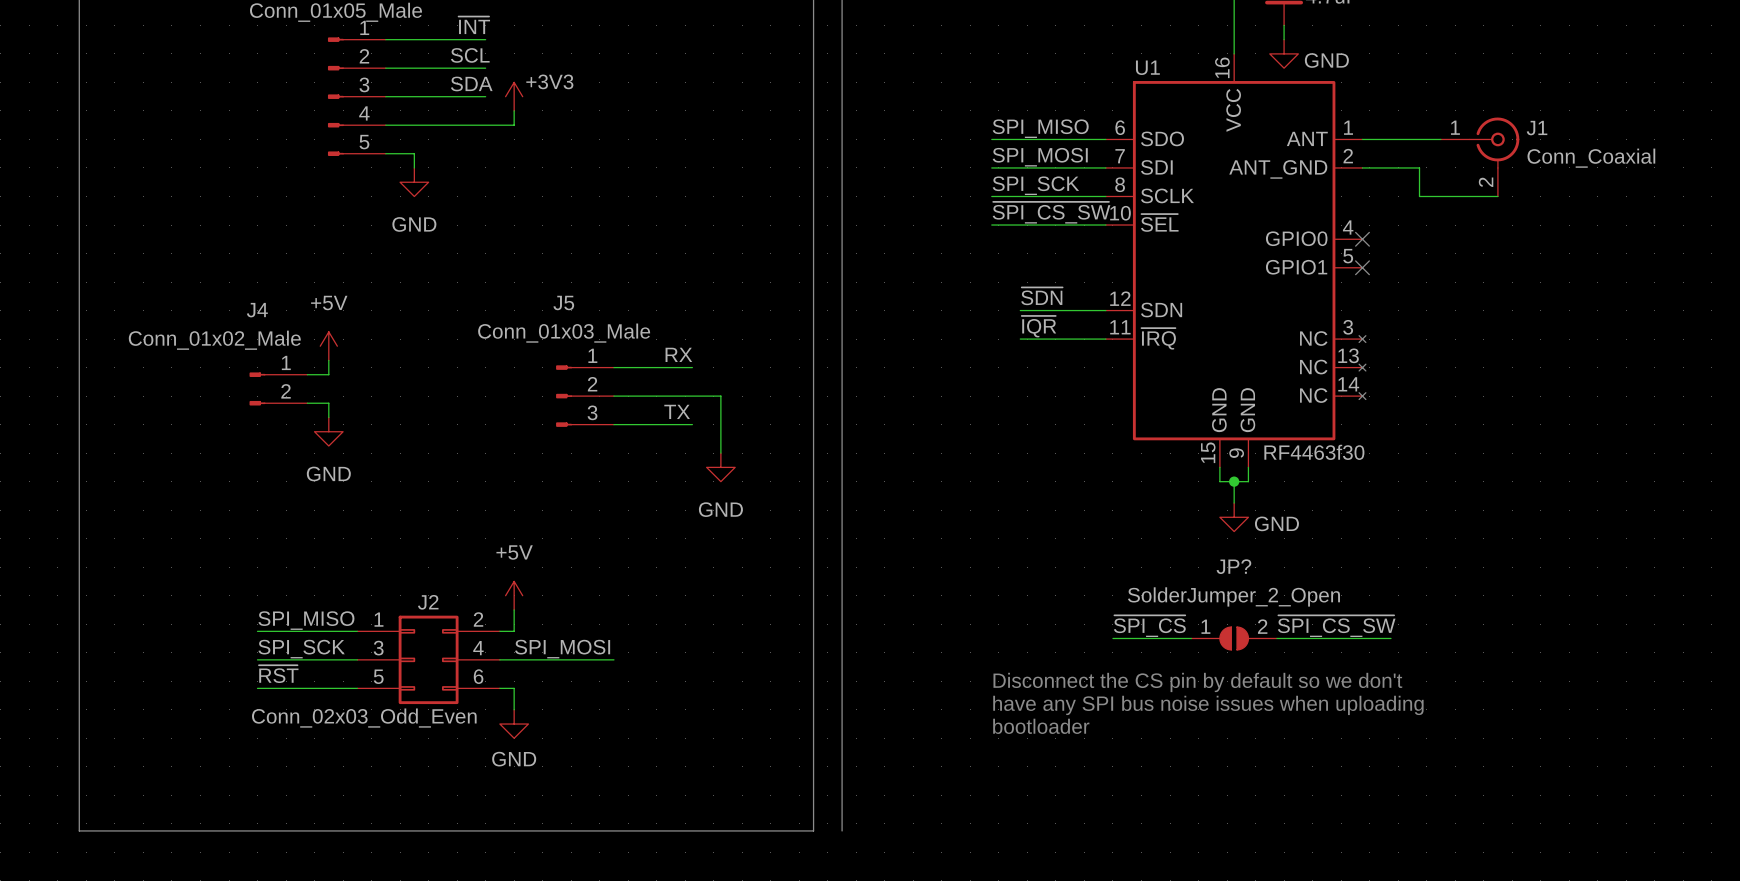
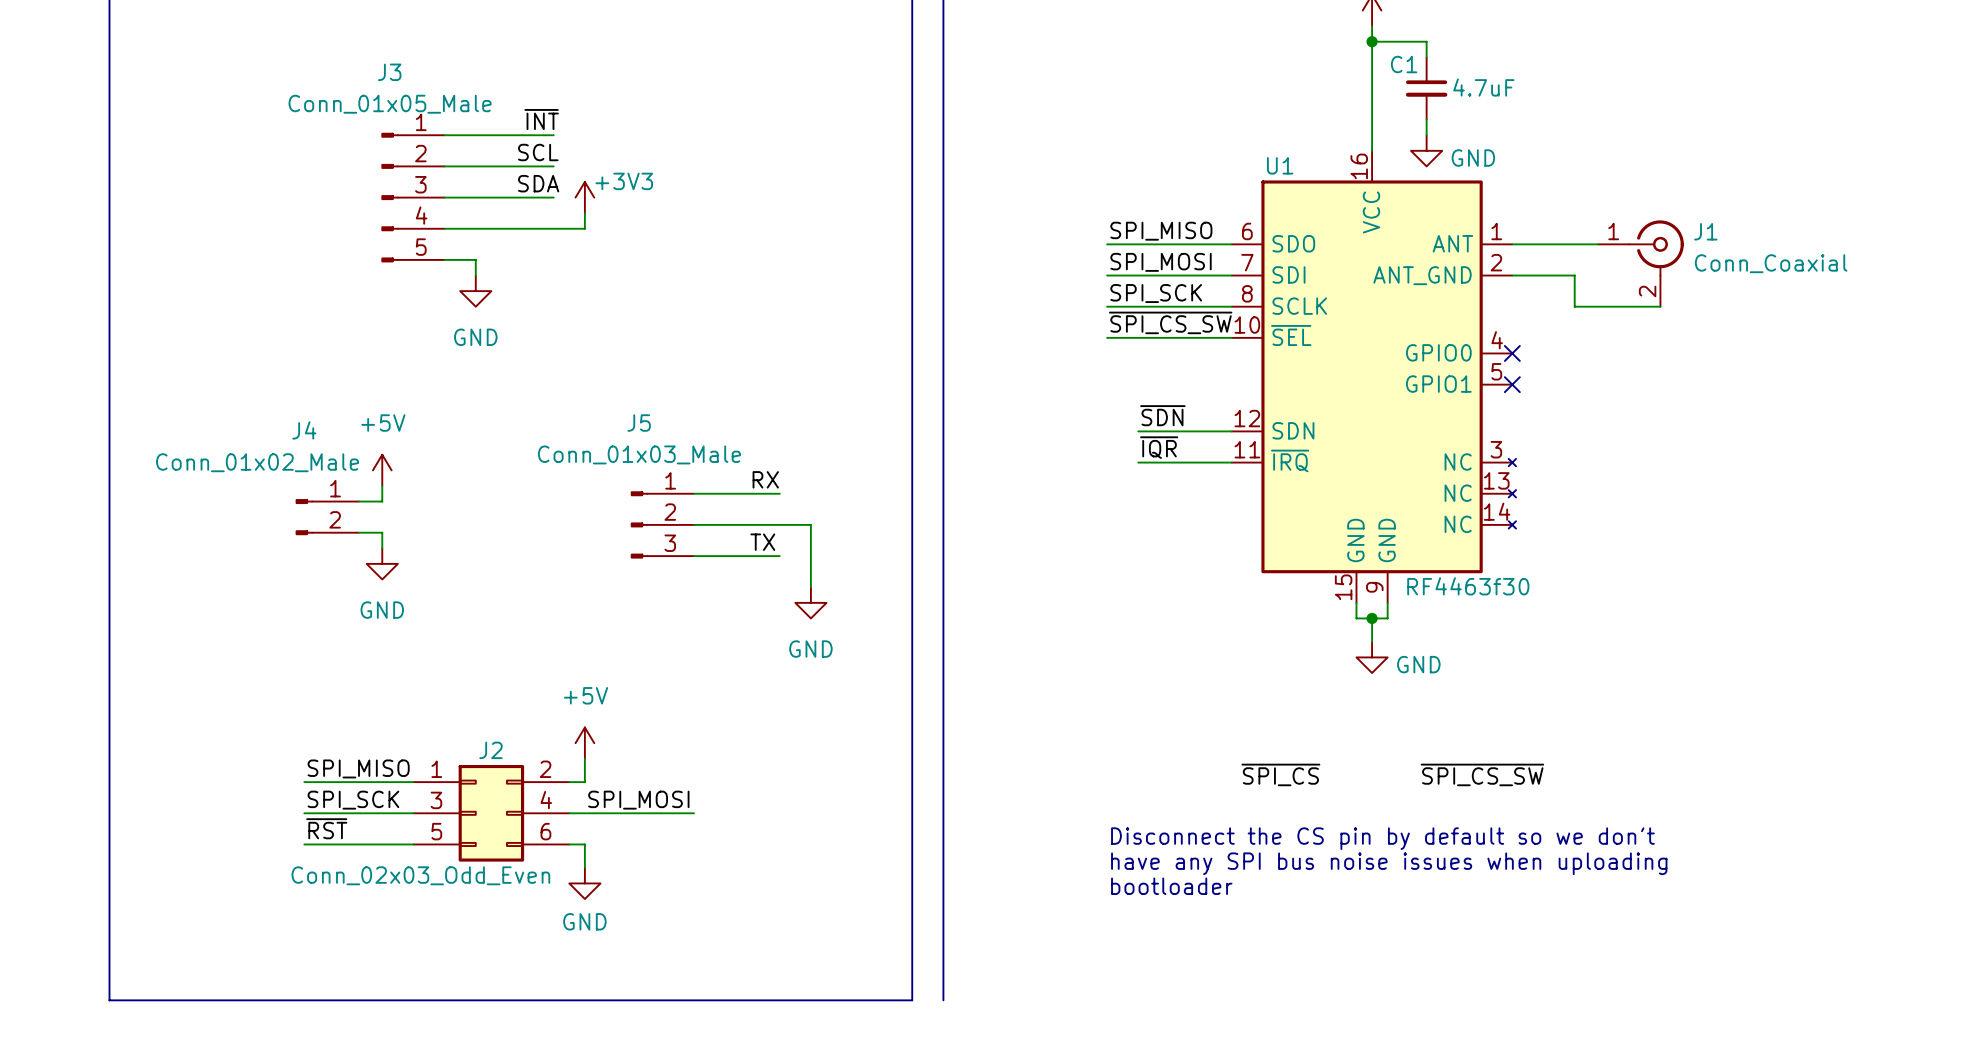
wire: (1112, 638) (1191, 638) -> none
JP?: SolderJumper_2_Open (1234, 638) -> none
wire: (1276, 638) (1391, 638) -> none

